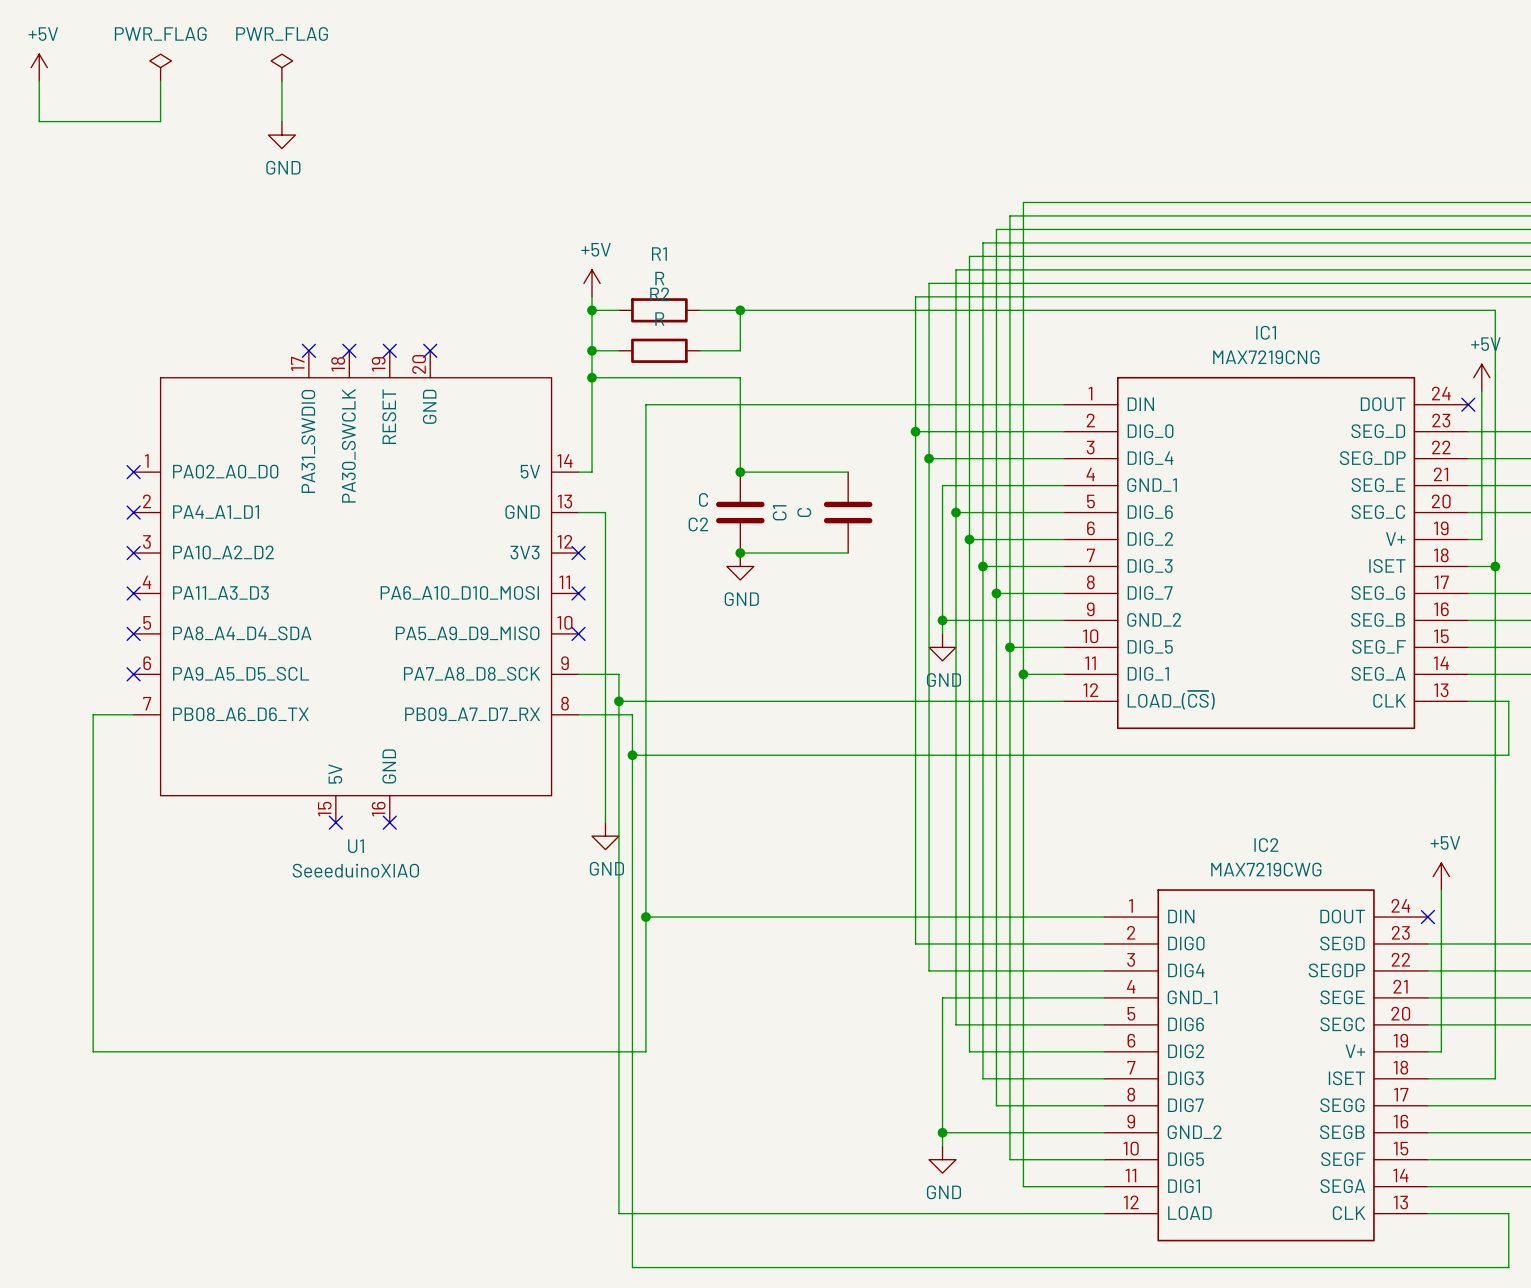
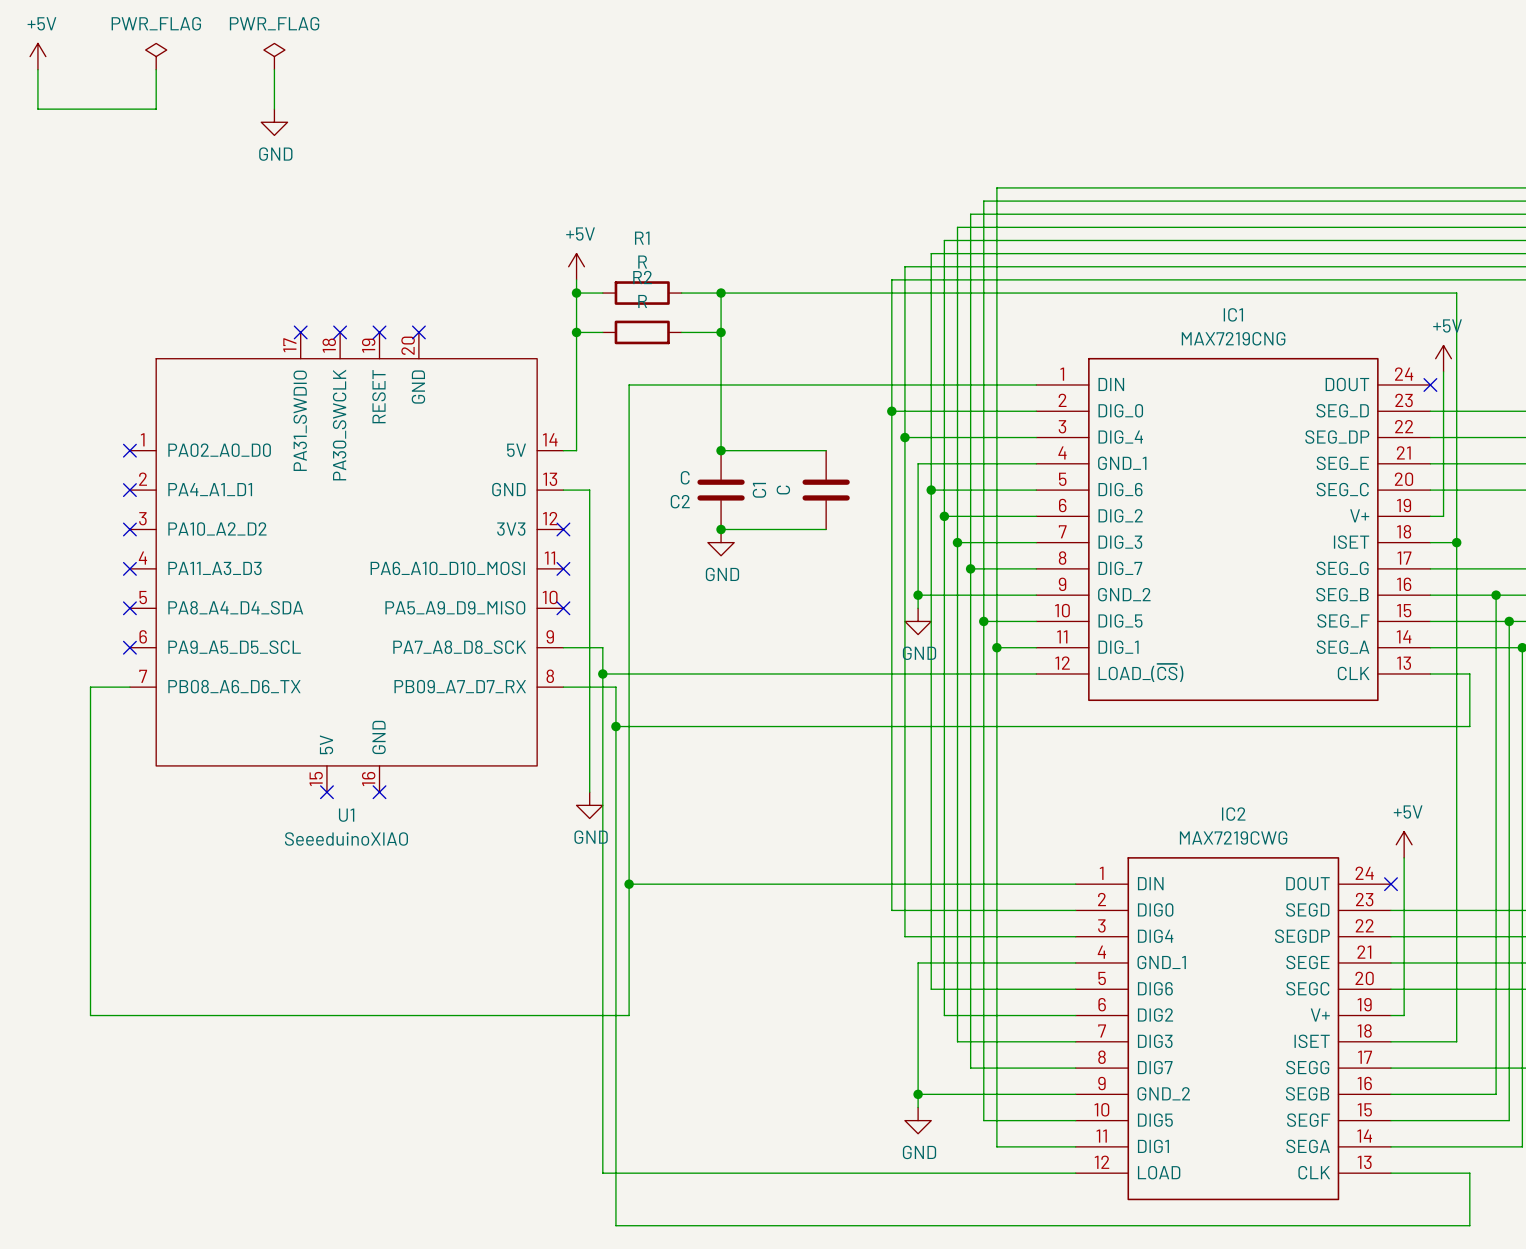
junction: none -> (721, 332)
wire: (592, 377) (740, 377) -> (721, 332) (721, 358)
junction: (592, 377) -> none

